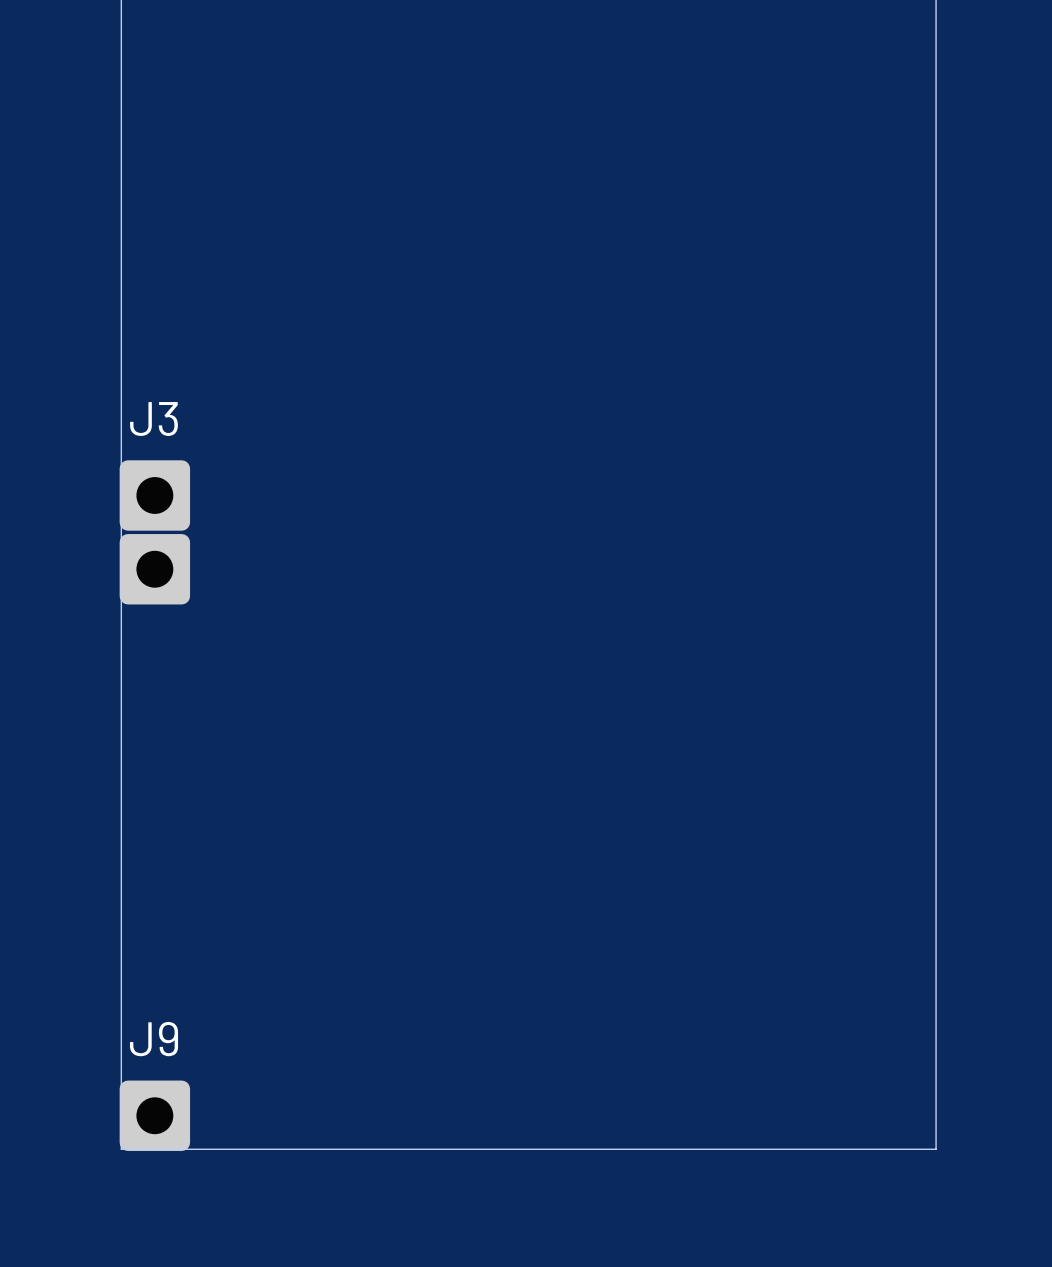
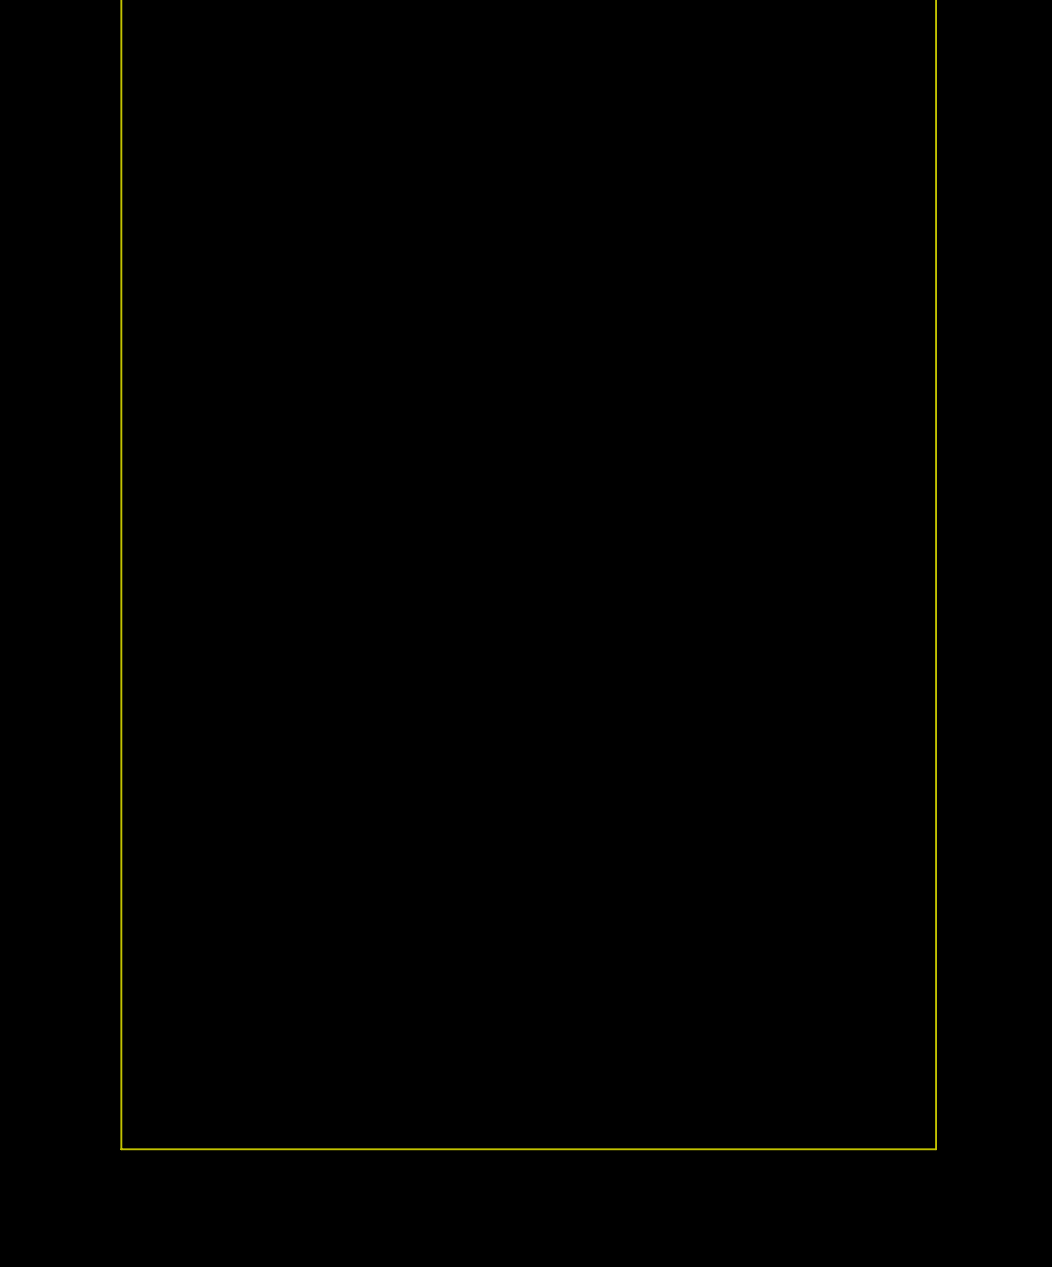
J3: (154, 495) -> none
part: (154, 569) -> none
J9: (154, 1115) -> none

